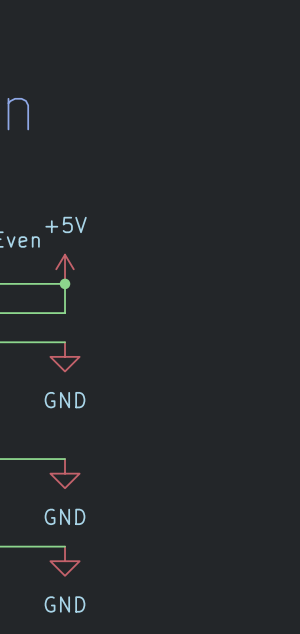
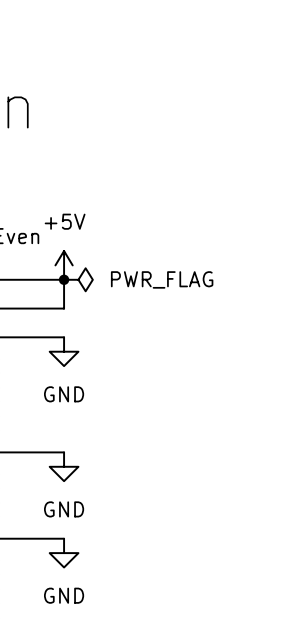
power symbol: none -> PWR_FLAG (78, 279)

